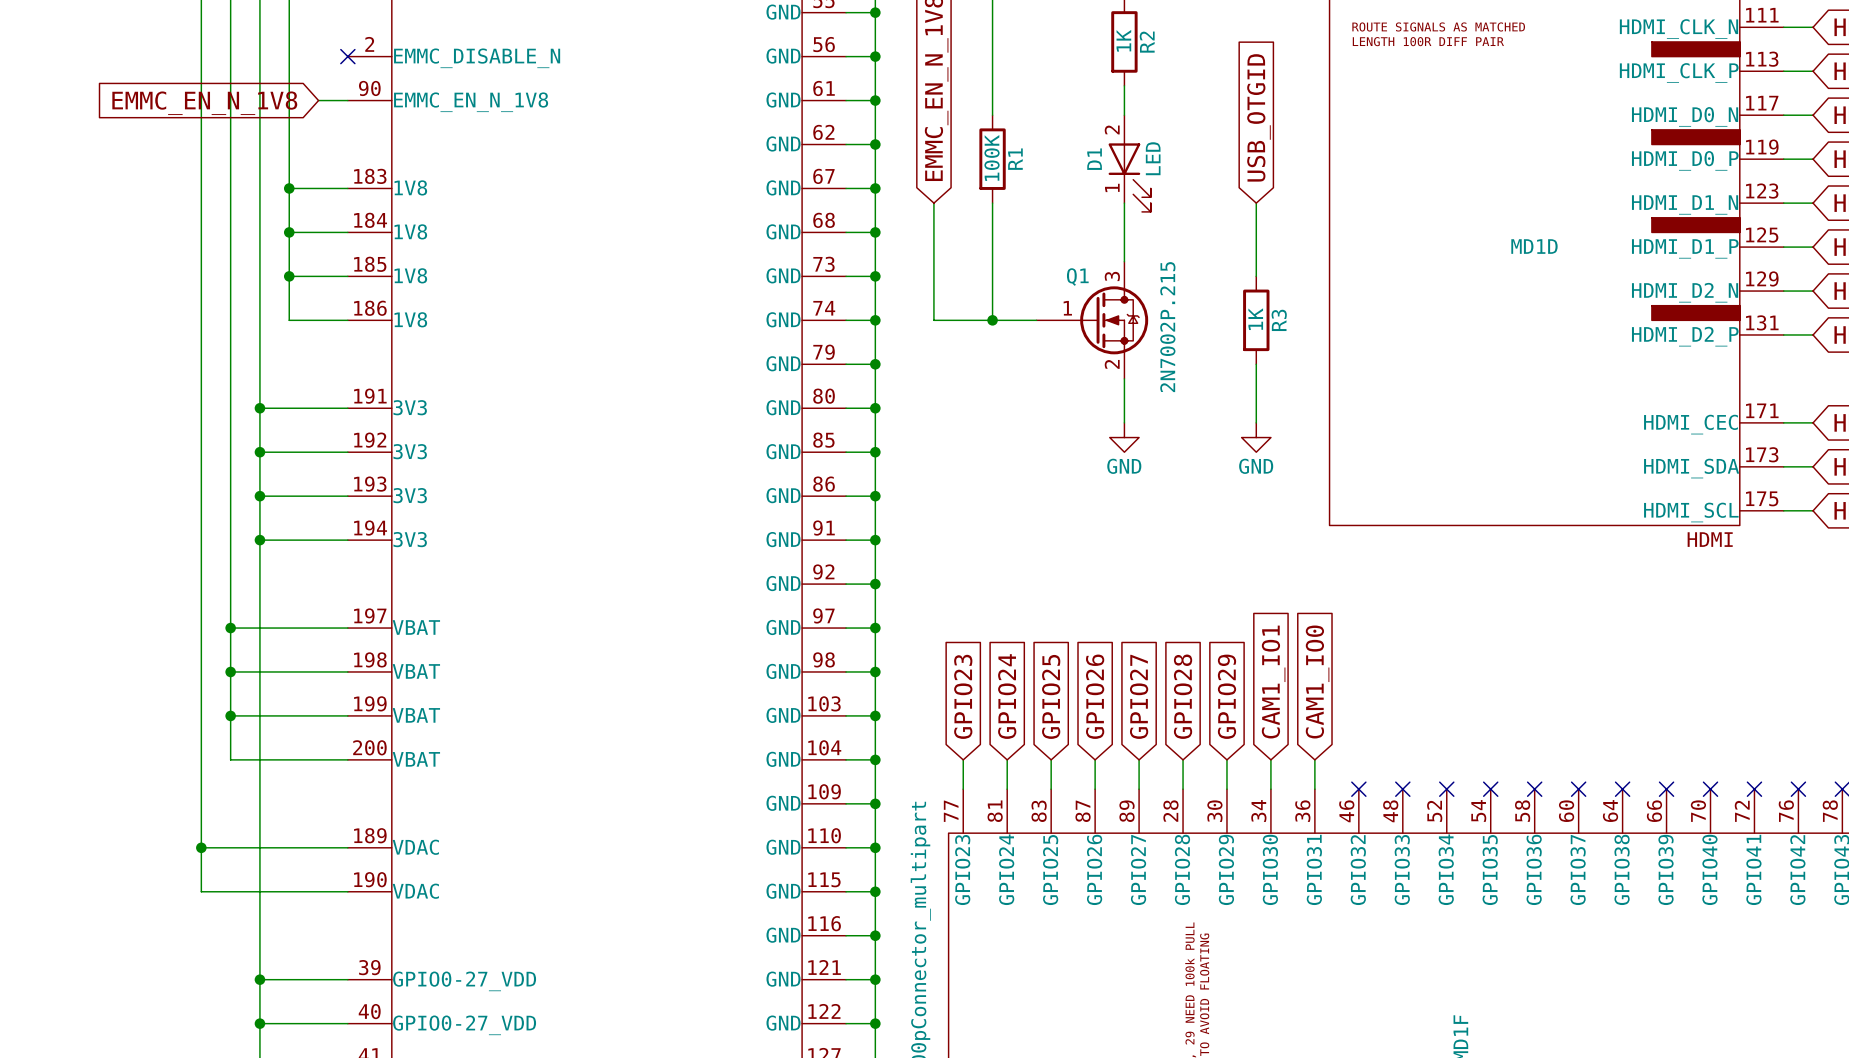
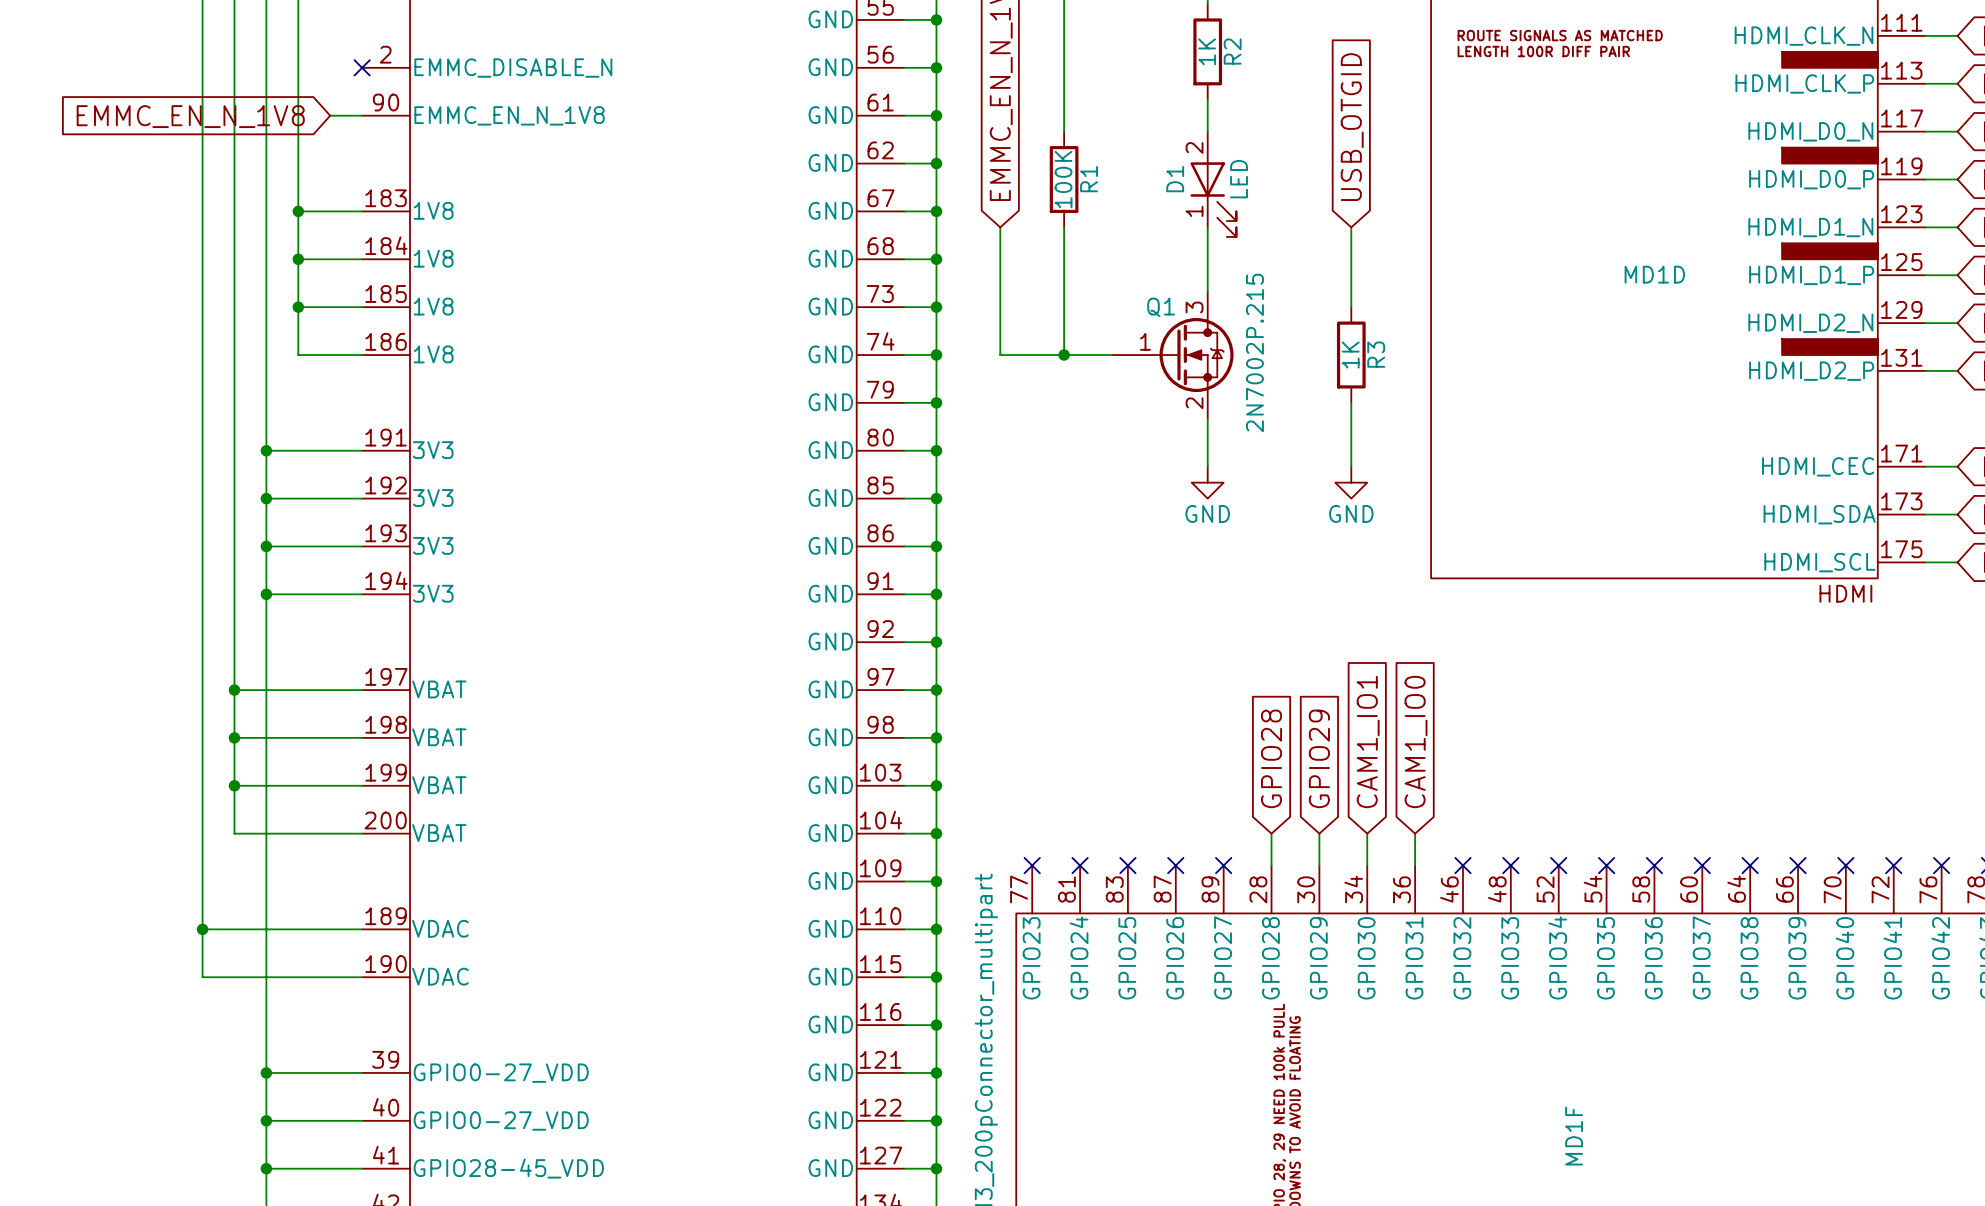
global label: GPIO23 (963, 696) -> none
global label: GPIO24 (1007, 696) -> none
global label: GPIO25 (1051, 696) -> none
global label: GPIO26 (1095, 696) -> none
global label: GPIO27 (1139, 696) -> none
wire: (963, 759) (963, 789) -> none
wire: (1007, 759) (1007, 789) -> none
wire: (1051, 759) (1051, 789) -> none
wire: (1095, 759) (1095, 789) -> none
wire: (1139, 759) (1139, 789) -> none
no-connect mark: none -> (1032, 865)
no-connect mark: none -> (1080, 865)
no-connect mark: none -> (1127, 865)
no-connect mark: none -> (1175, 865)
no-connect mark: none -> (1223, 865)

